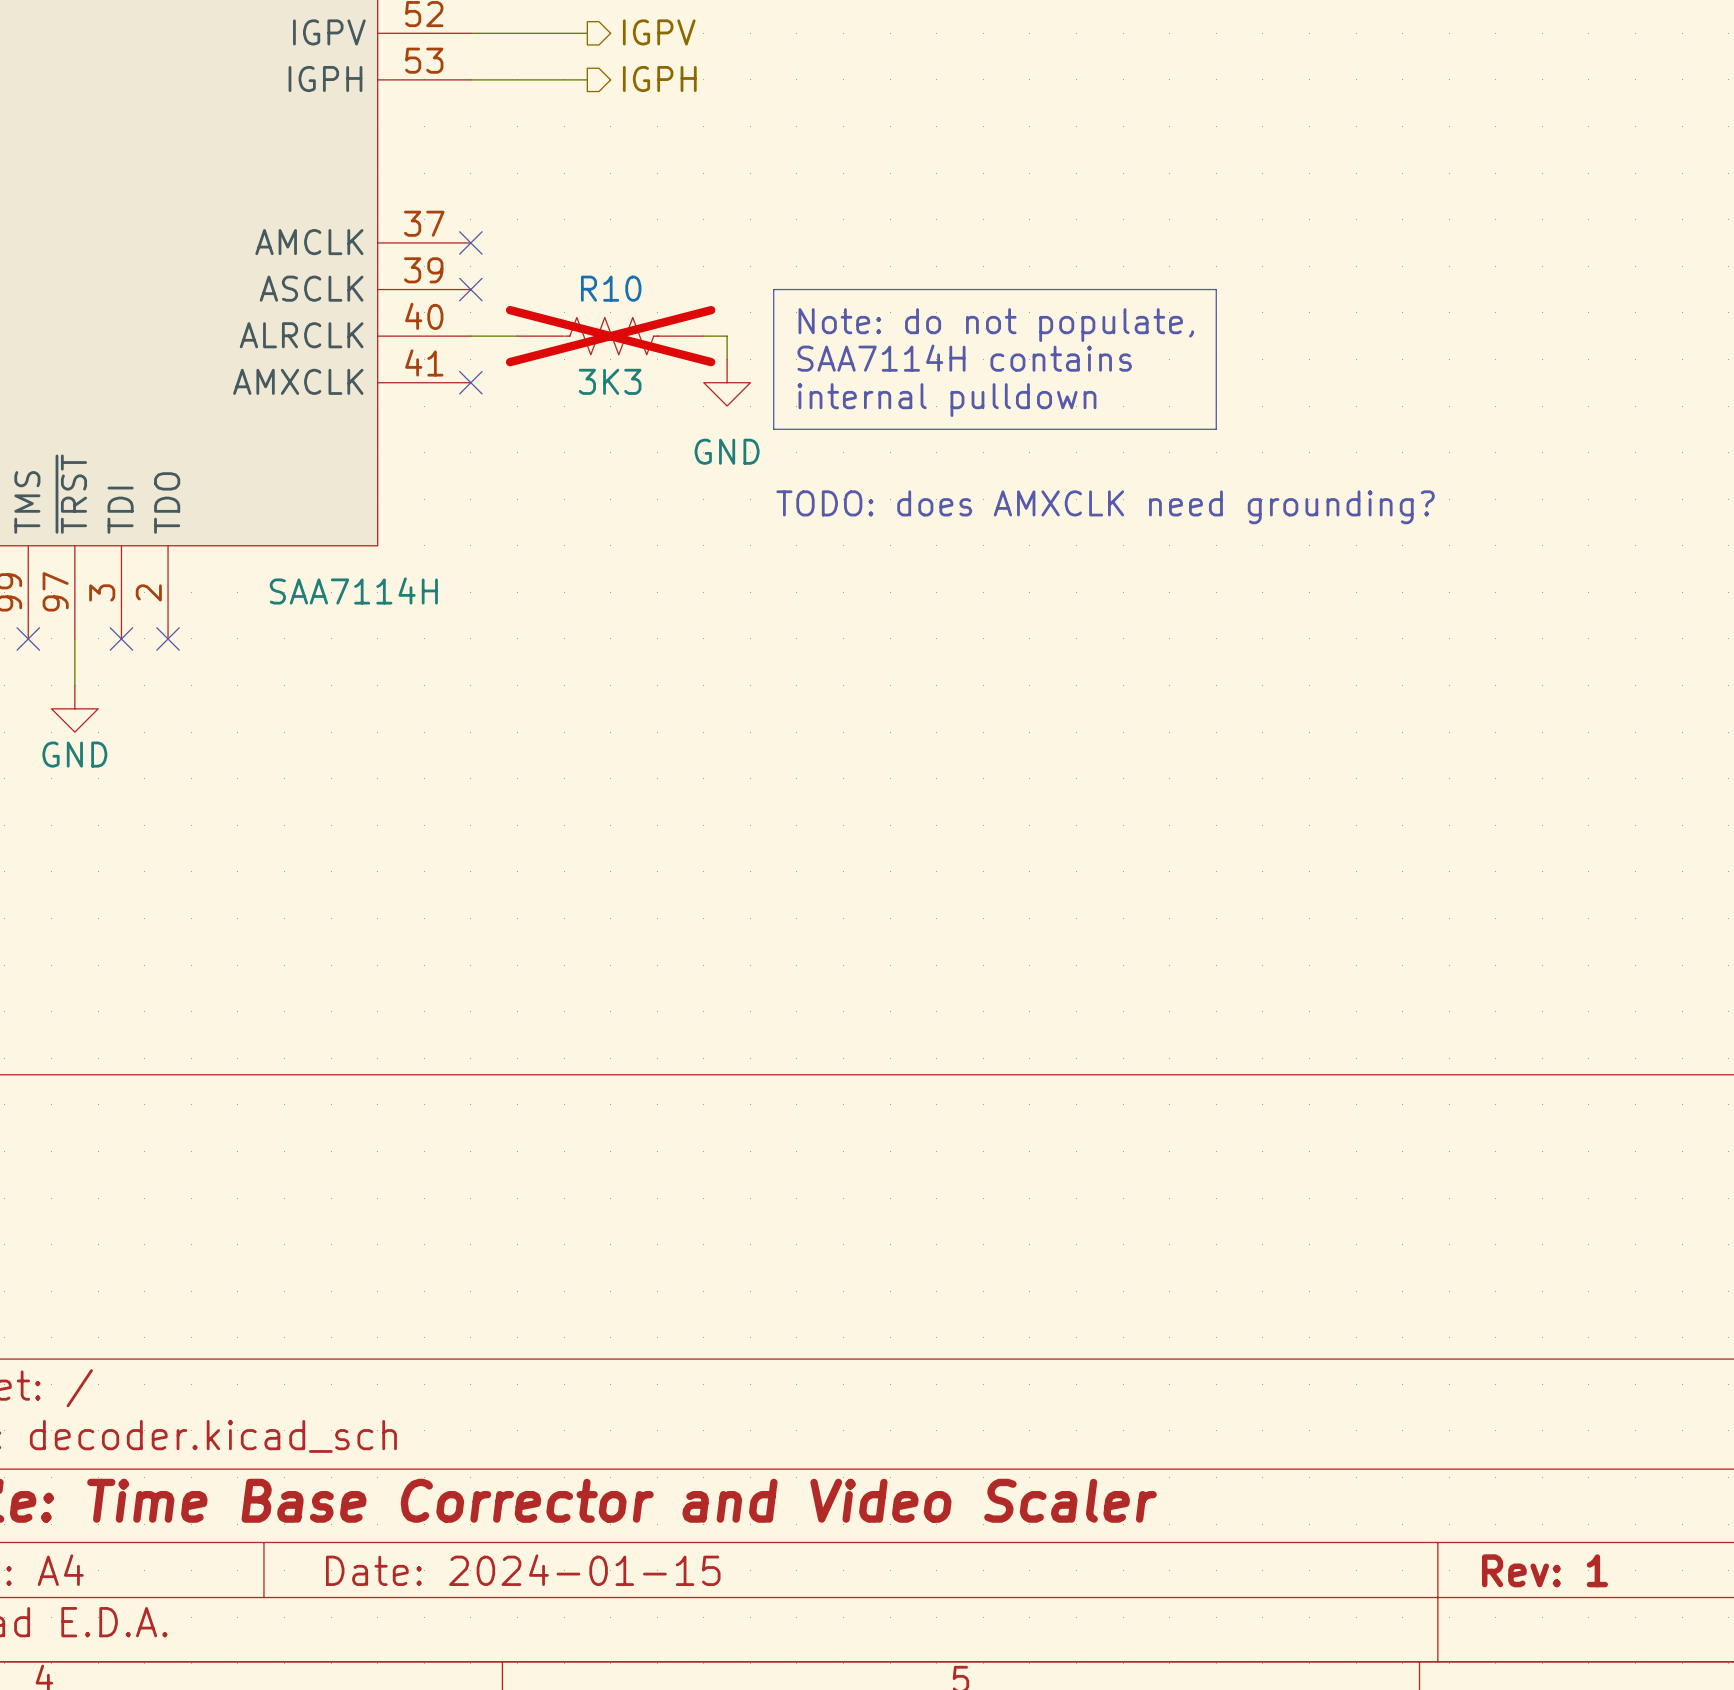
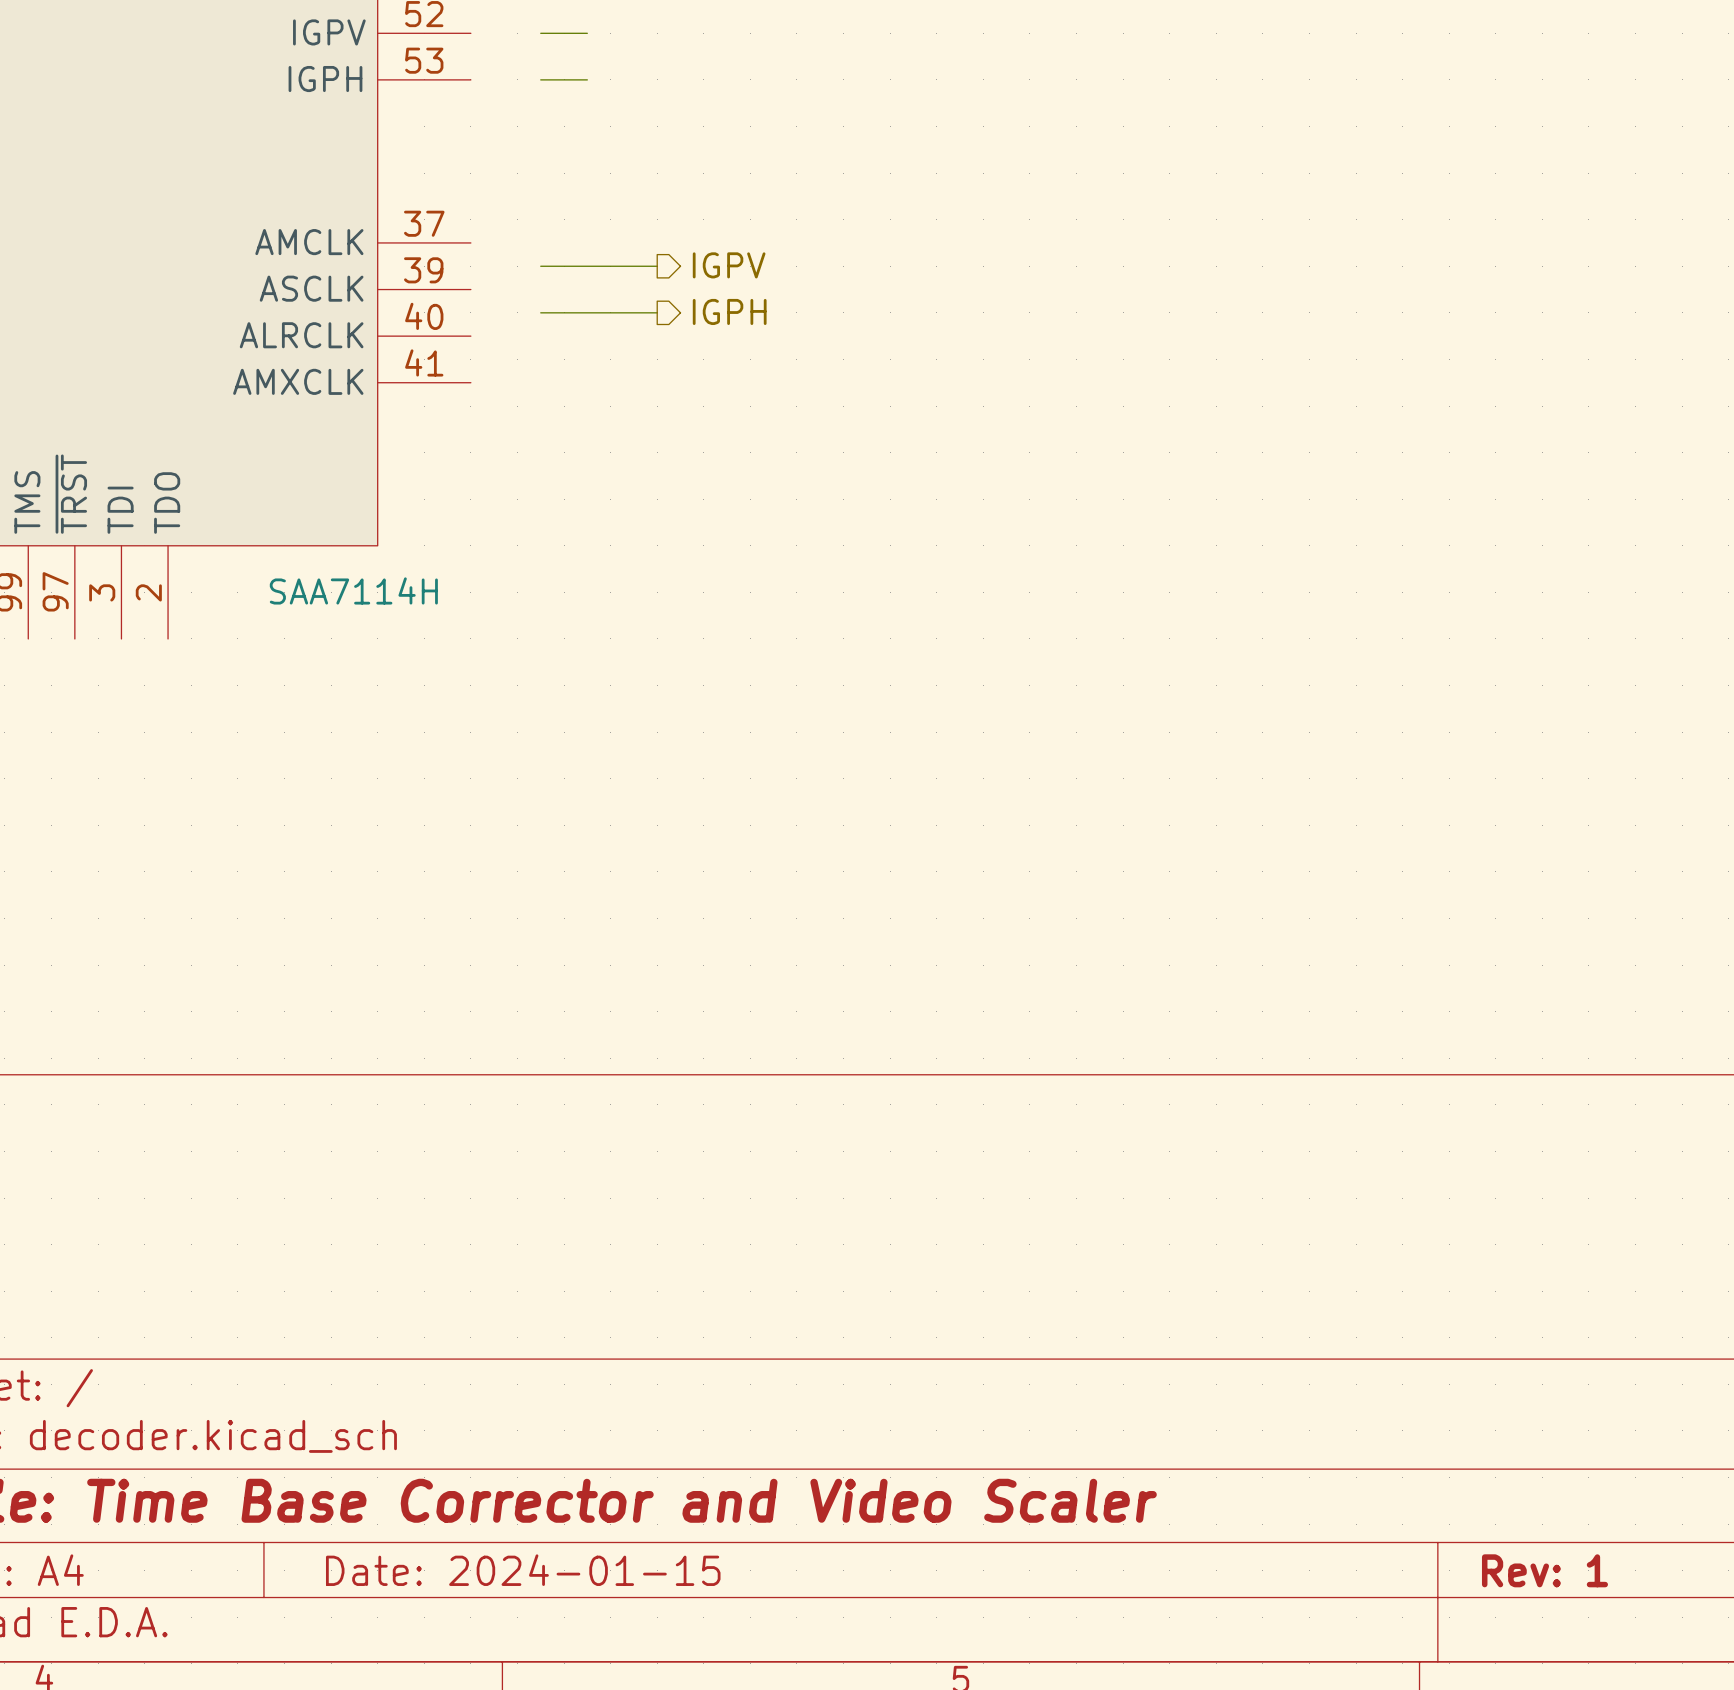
hierarchical label position: IGPV (659, 32) -> IGPV (729, 265)
wire: (470, 33) (540, 33) -> none
wire: (470, 79) (540, 79) -> none
hierarchical label position: IGPH (659, 79) -> IGPH (729, 311)
no-connect mark: (470, 242) -> none
wire: none -> (540, 266) (657, 266)
no-connect mark: (470, 289) -> none
line: (773, 289) (773, 429) (1216, 429) (1216, 289) (773, 289) -> none
wire: none -> (540, 312) (657, 312)
text: Note: do not populate, (996, 325) -> none
wire: (470, 336) (517, 336) -> none
R10: 3K3 (610, 336) -> none
wire: (703, 336) (727, 336) (727, 359) -> none
text: SAA7114H contains (964, 358) -> none
no-connect mark: (470, 382) -> none
power symbol: GND (727, 382) -> none
text: internal pulldown (946, 400) -> none
text: TODO: does AMXCLK need grounding? (1105, 507) -> none
no-connect mark: (28, 638) -> none
wire: (74, 638) (74, 685) -> none
no-connect mark: (121, 638) -> none
no-connect mark: (168, 638) -> none
power symbol: GND (74, 708) -> none

